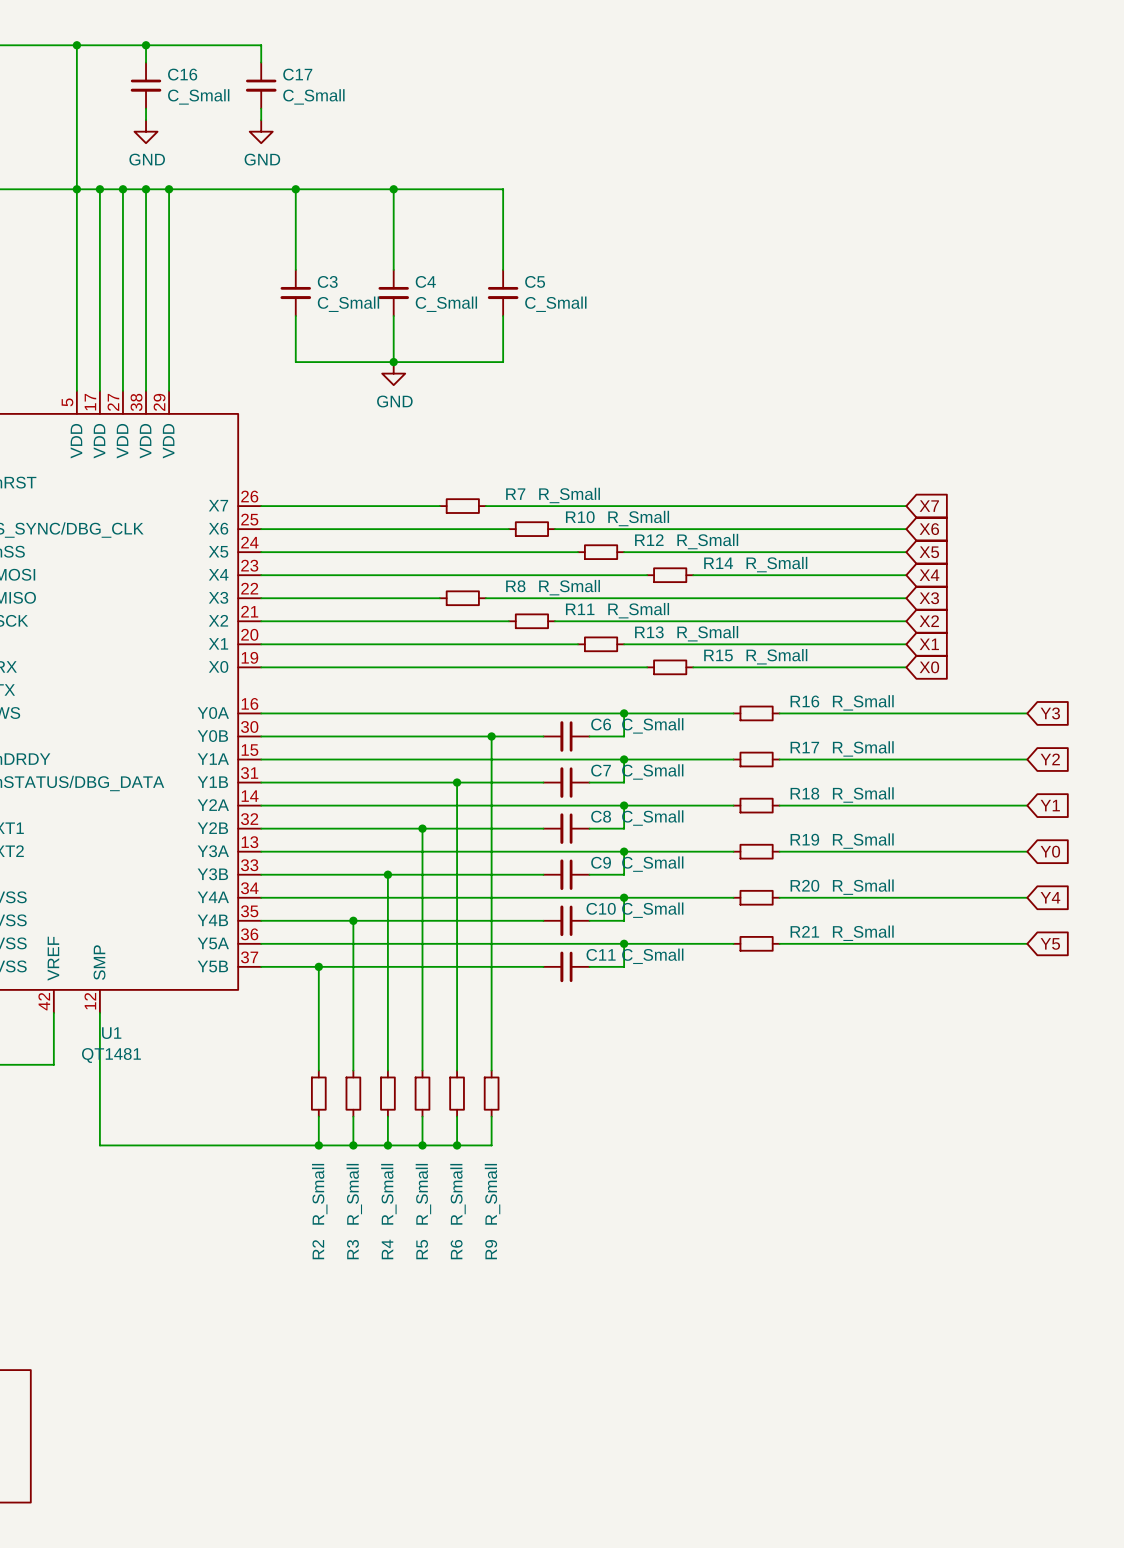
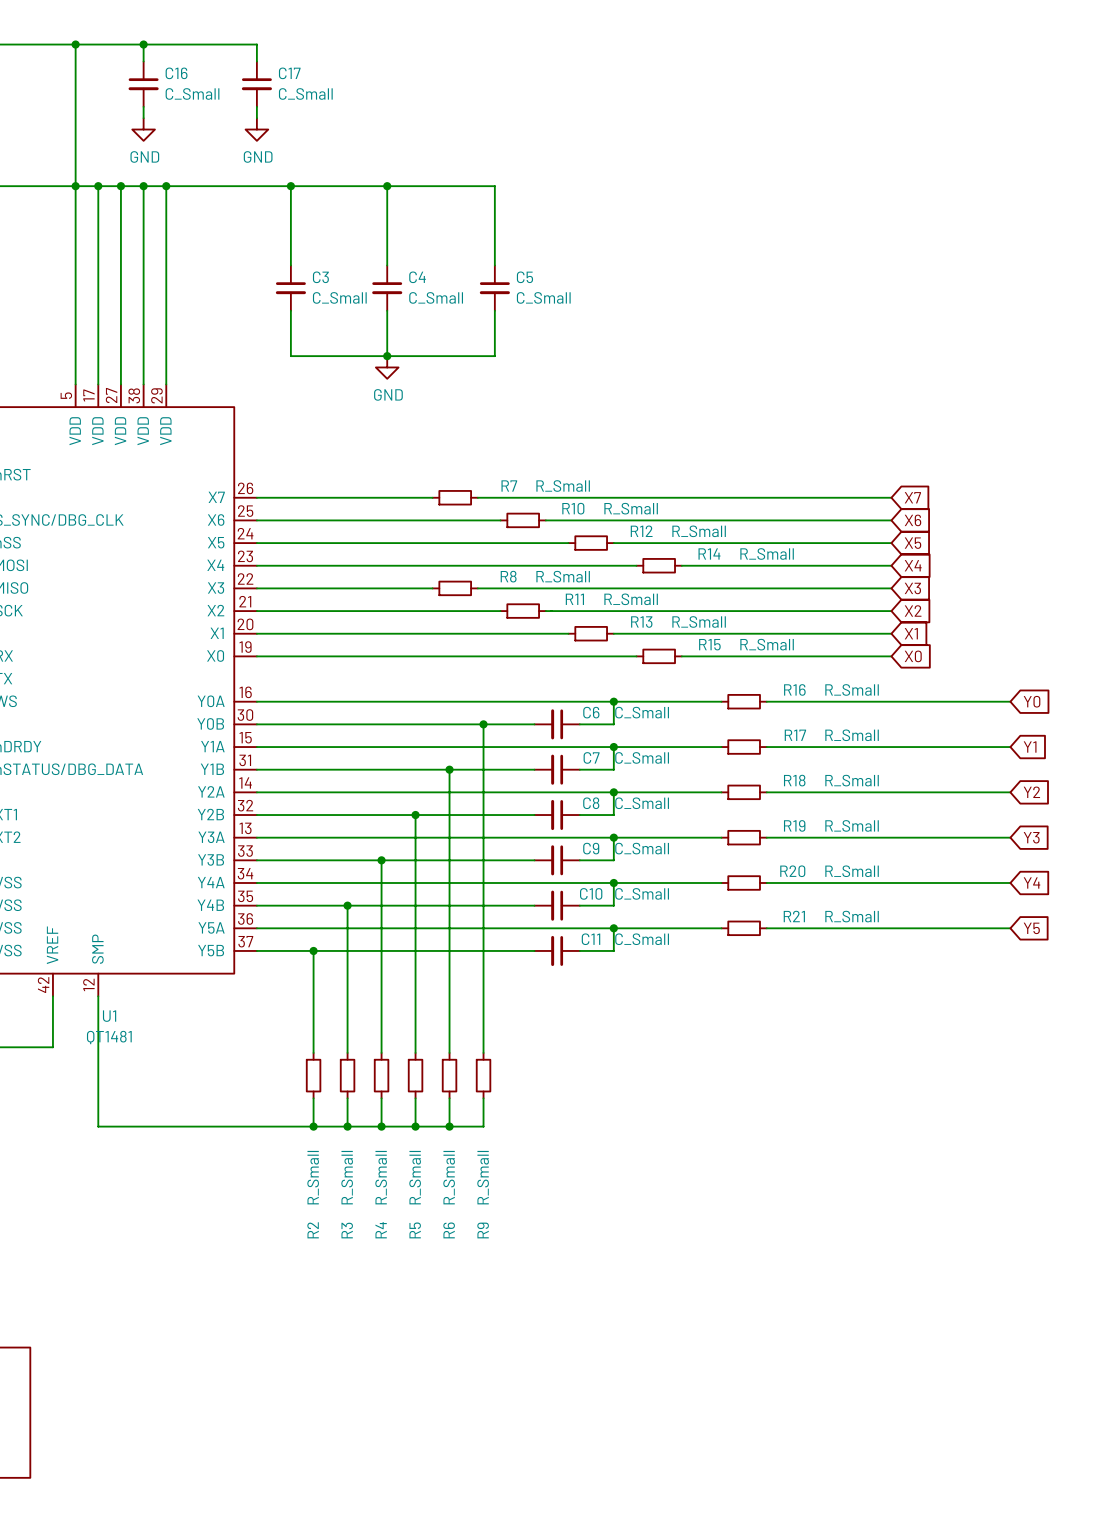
global label: Y3 (1050, 713) -> Y0 (1032, 701)
global label: Y2 (1050, 759) -> Y1 (1030, 747)
global label: Y1 (1050, 805) -> Y2 (1031, 792)
global label: Y0 (1050, 851) -> Y3 (1031, 837)

